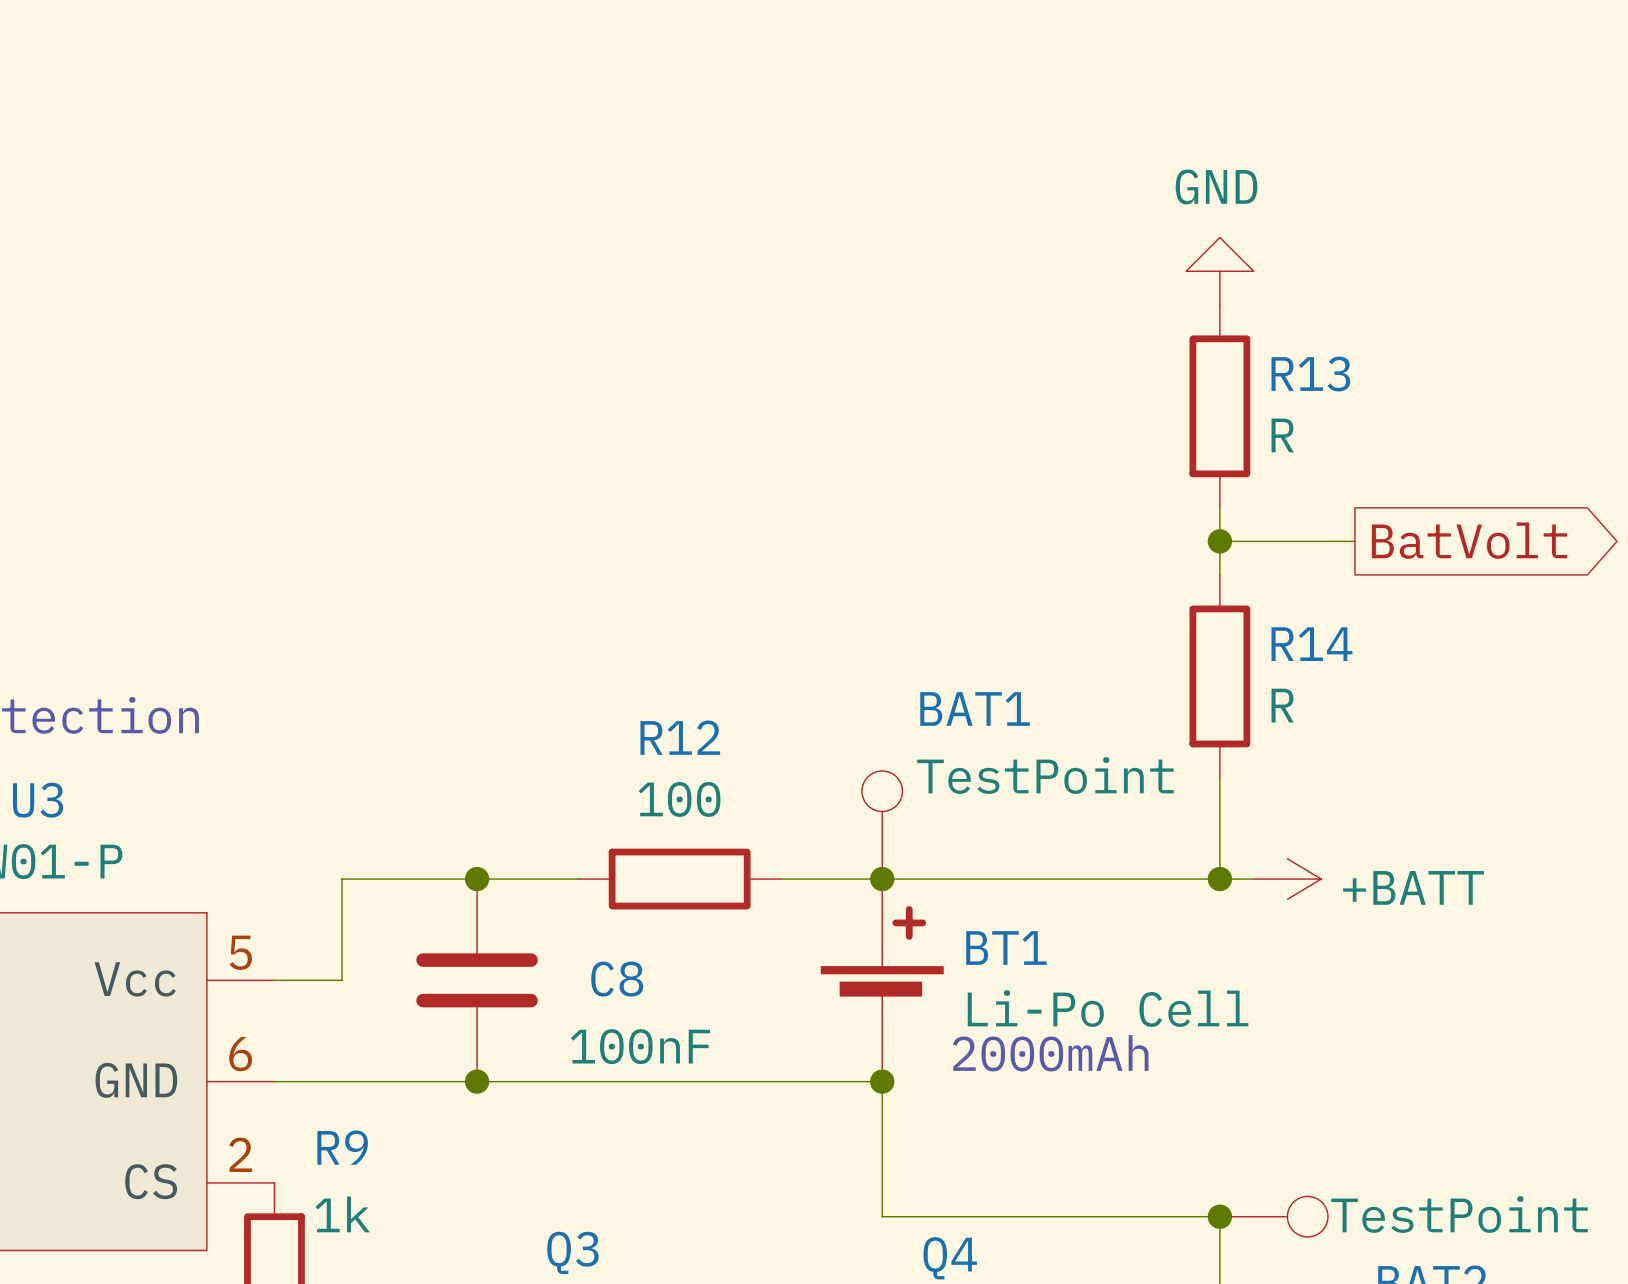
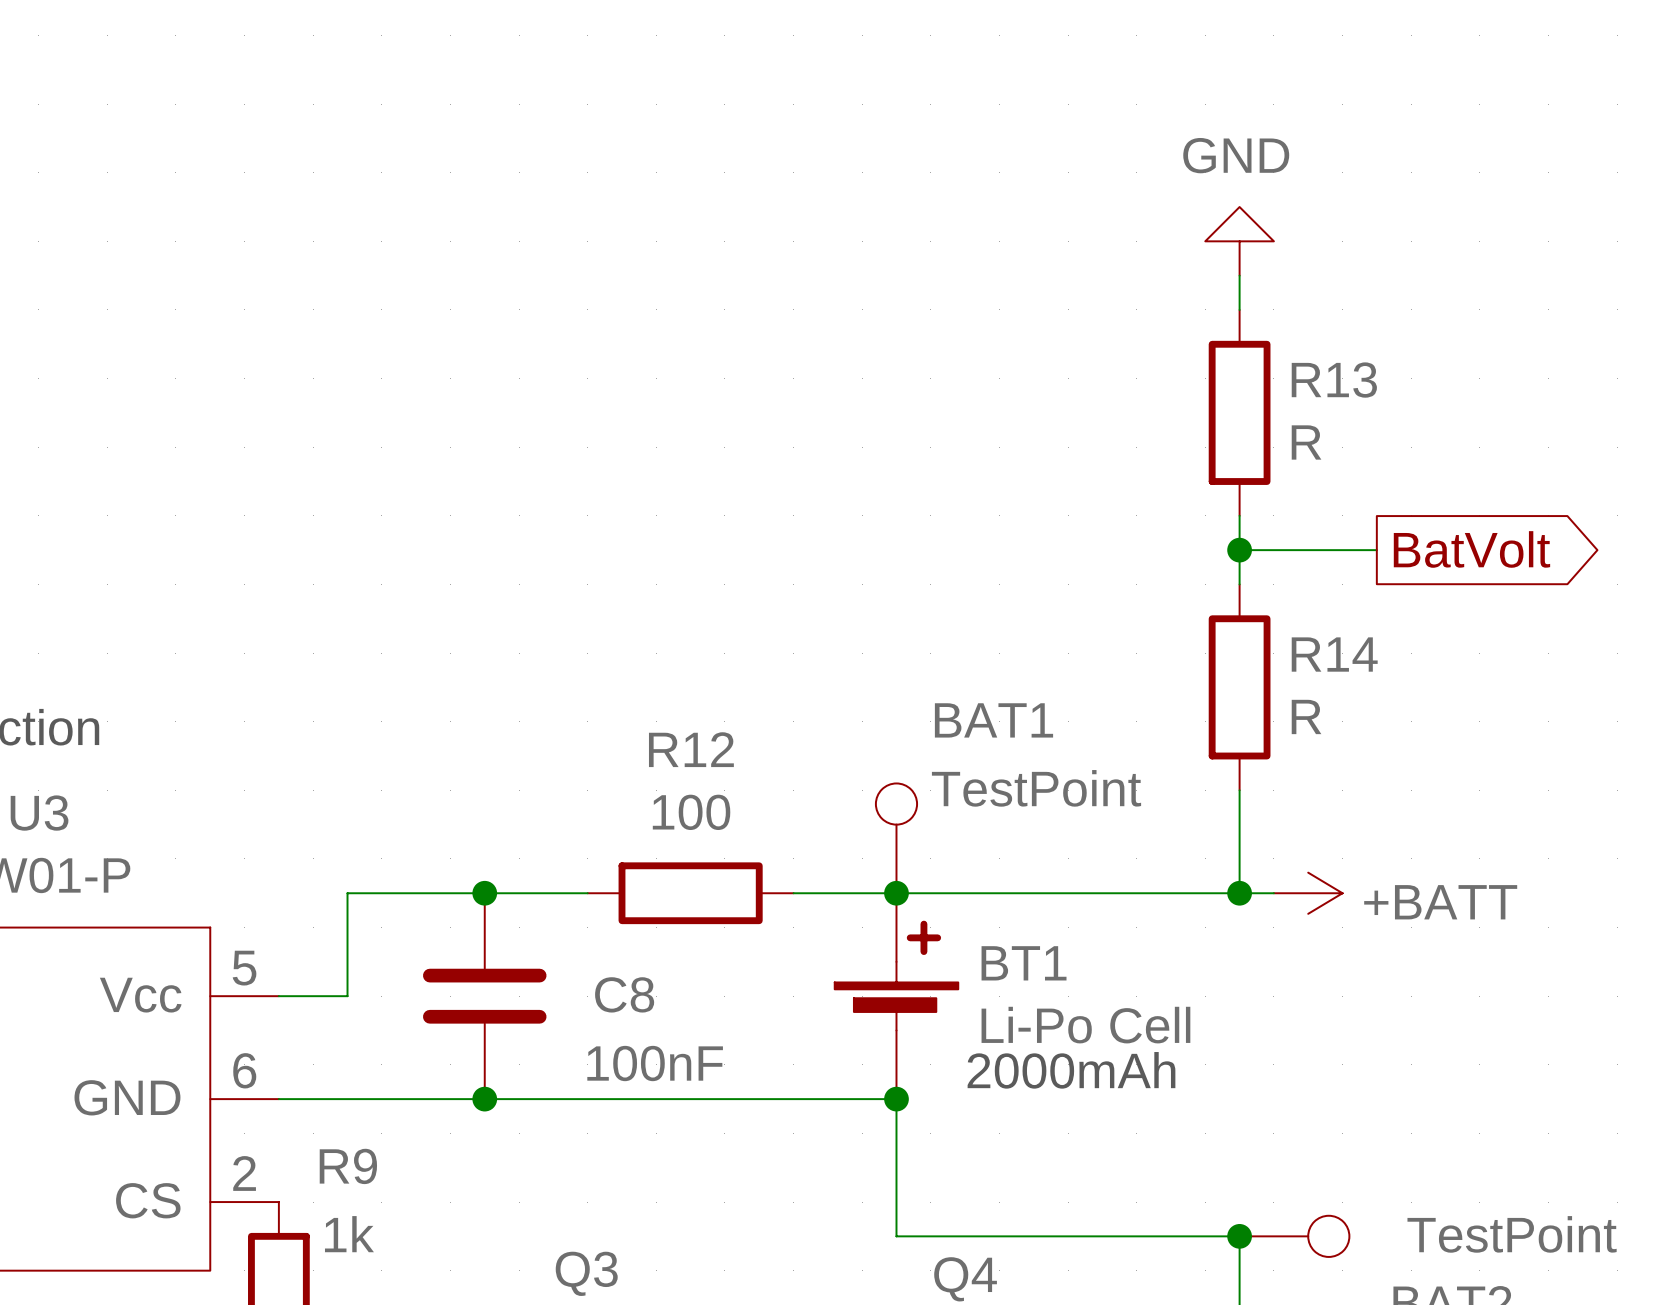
power symbol position: GND (1219, 271) -> GND (1239, 241)

